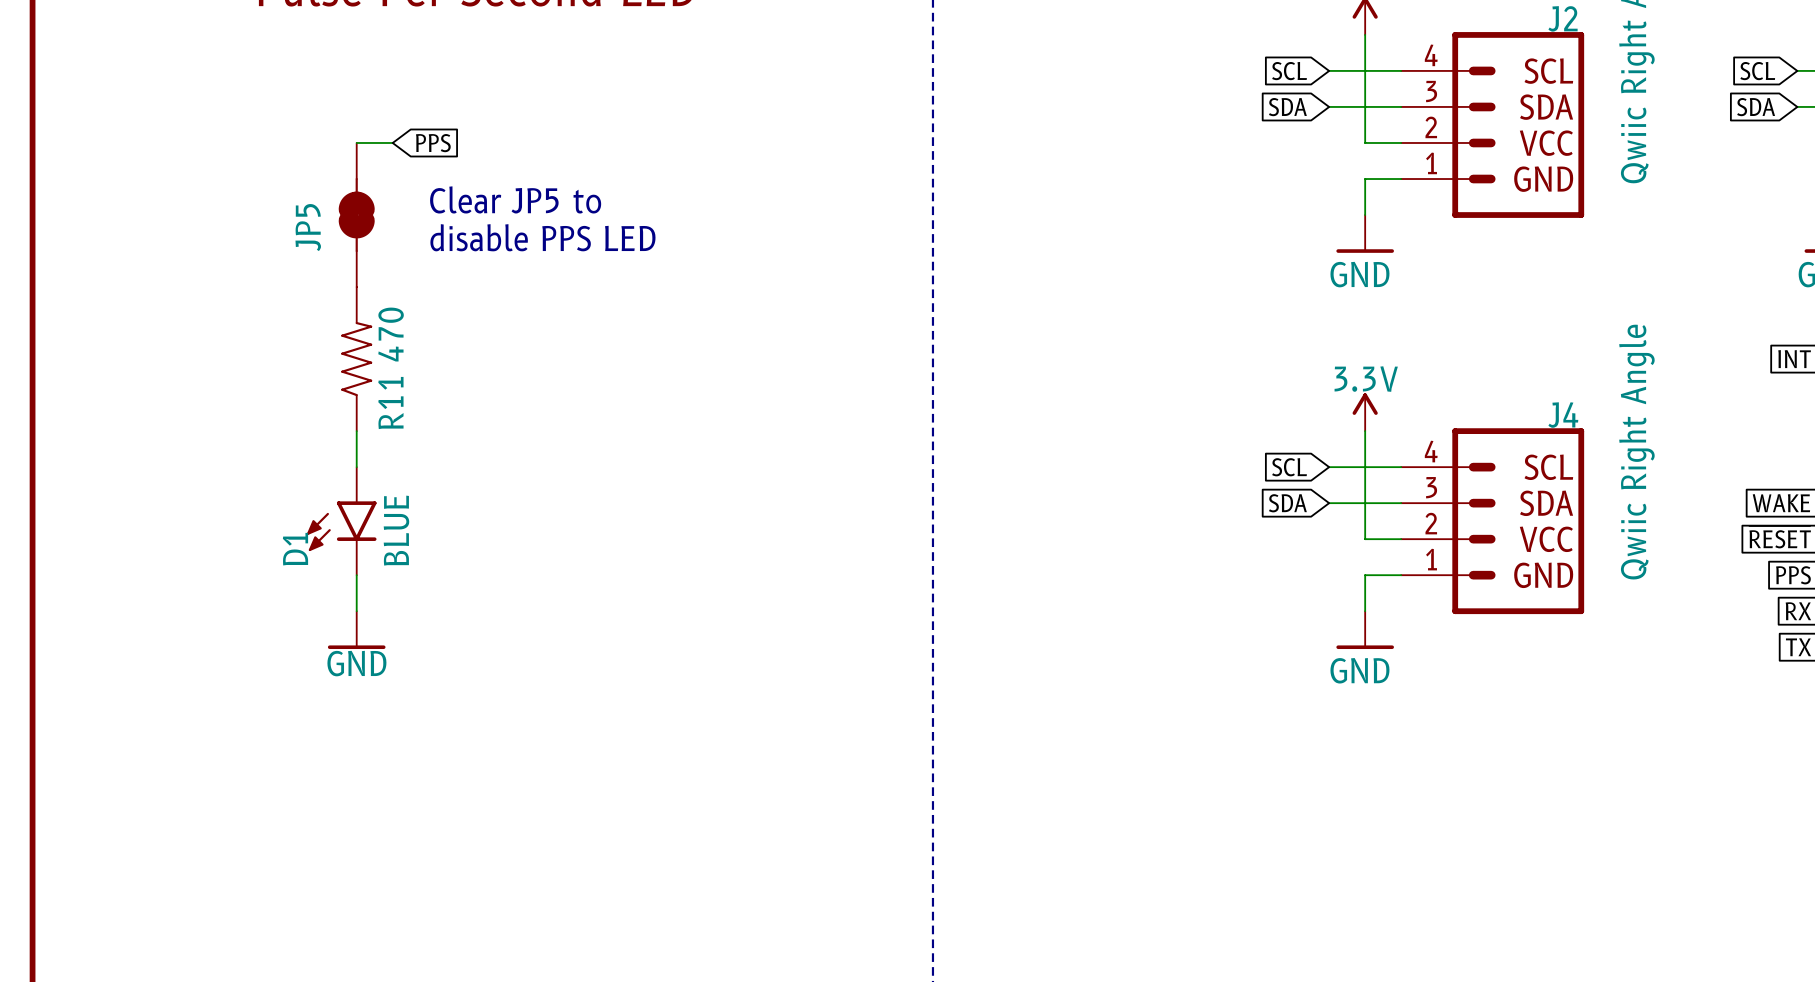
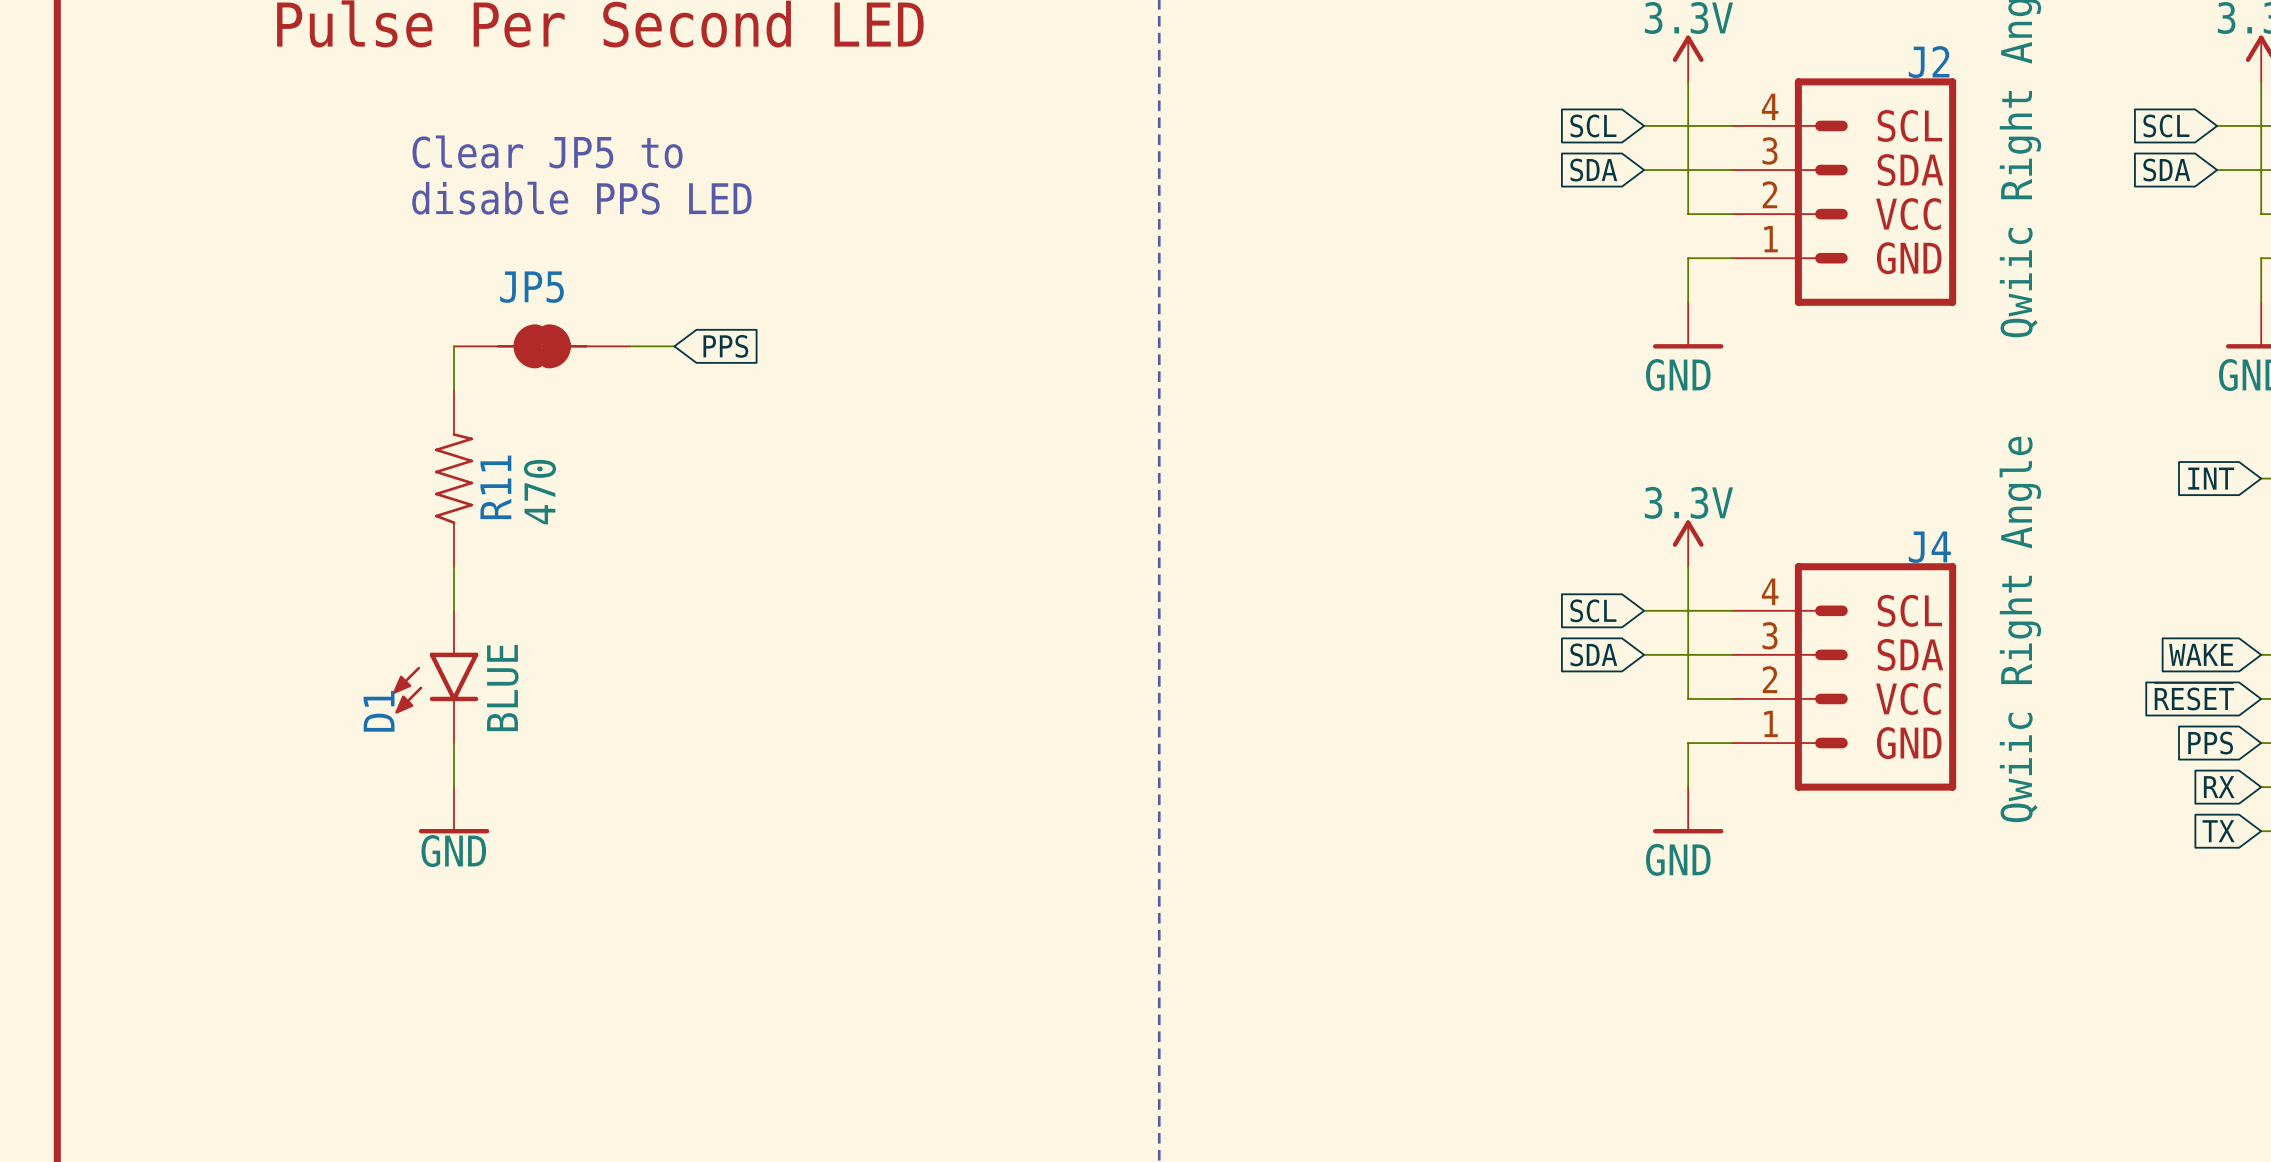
wire: (356, 142) (392, 142) -> (630, 346) (674, 346)
global label position: PPS (433, 143) -> PPS (725, 346)
text position: Clear JP5 to (515, 199) -> Clear JP5 to (547, 151)
JP5 rotation: 0° (356, 215) -> 90° clockwise (542, 346)
text position: disable PPS LED (542, 237) -> disable PPS LED (581, 198)
R11 value position: 470 (391, 334) -> 470 (539, 492)
R11 name position: R11 (390, 403) -> R11 (495, 487)

